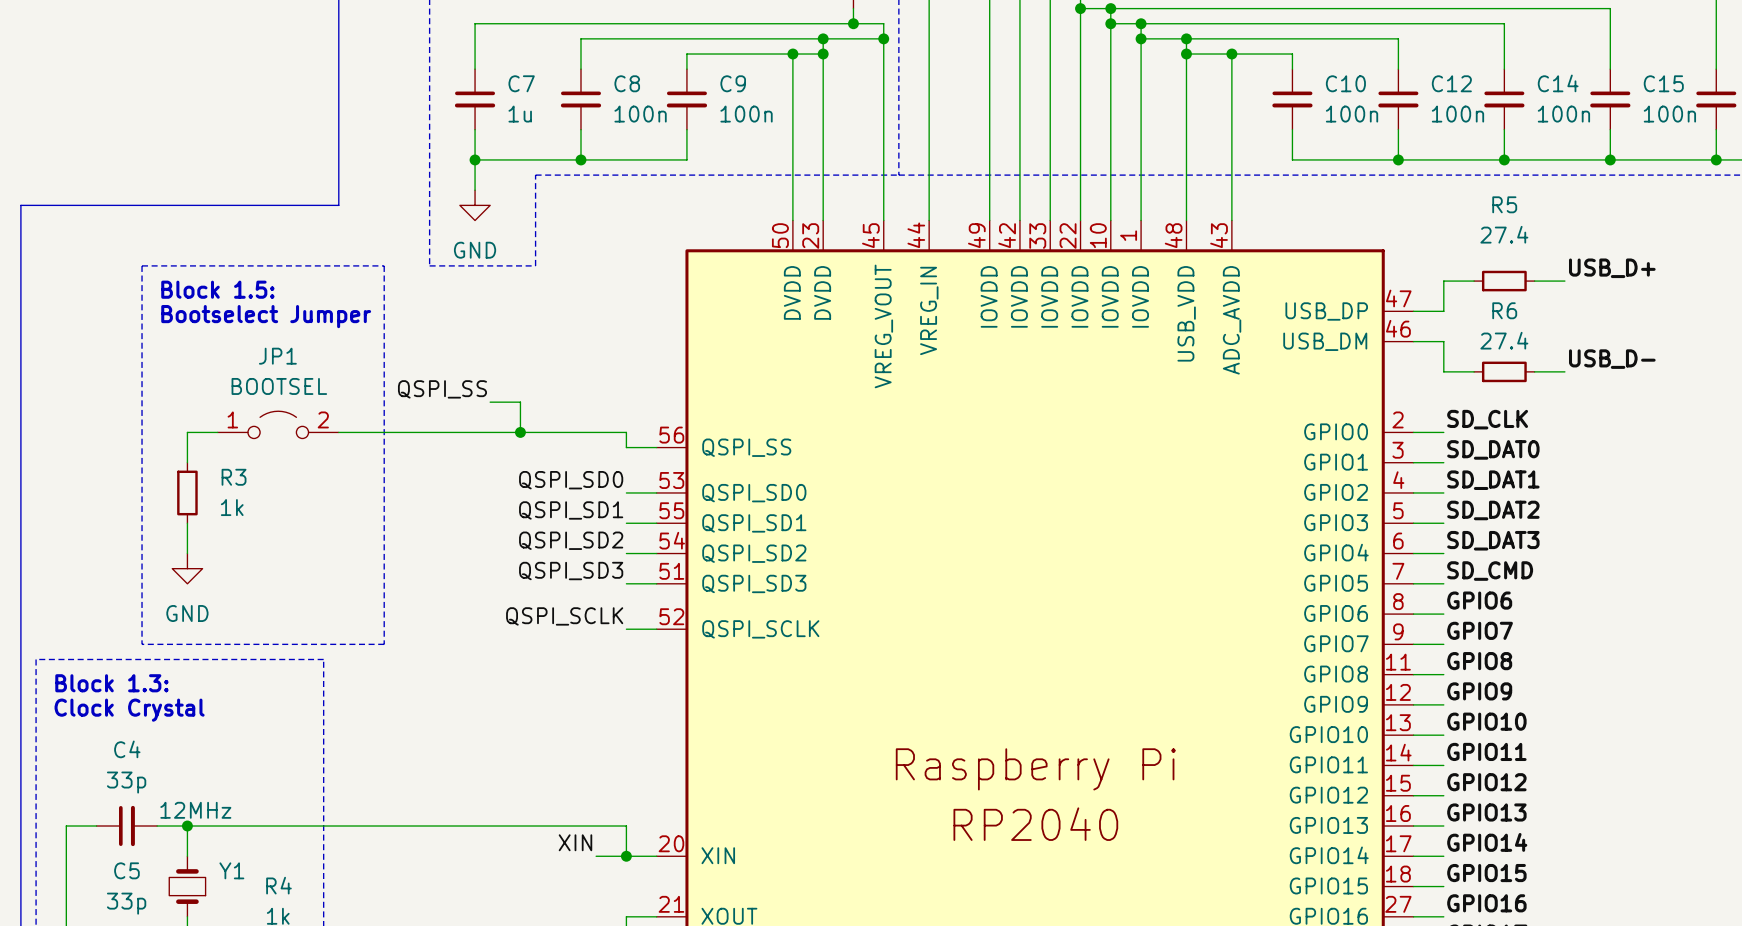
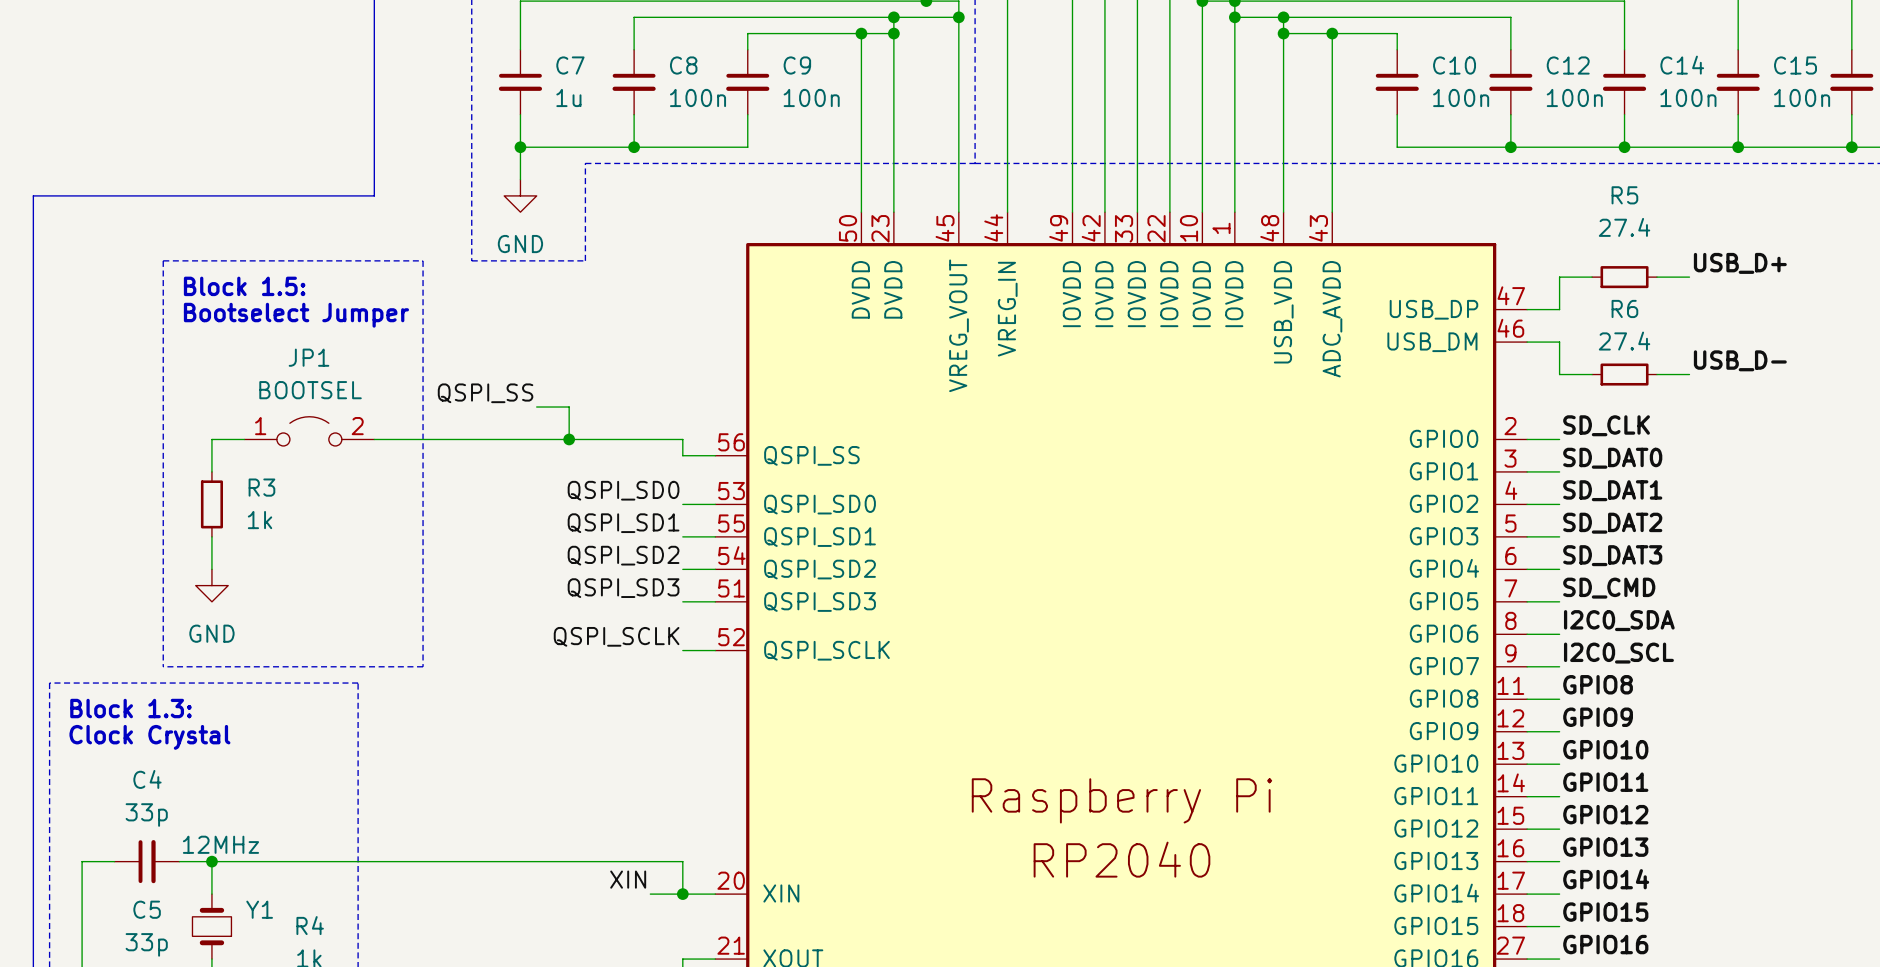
label: GPIO6 (1479, 600) -> I2C0_SDA (1619, 620)
label: GPIO7 (1480, 630) -> I2C0_SCL (1618, 653)

